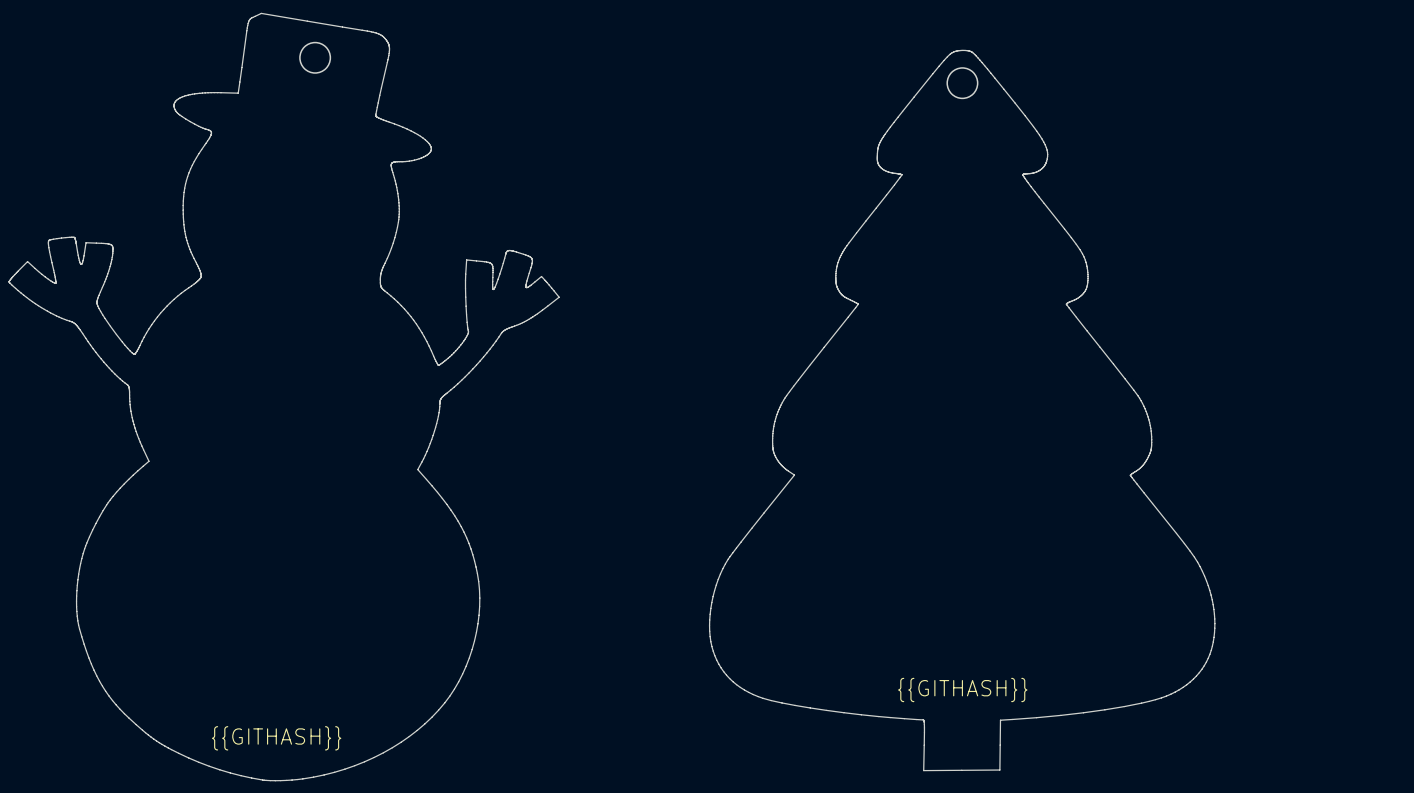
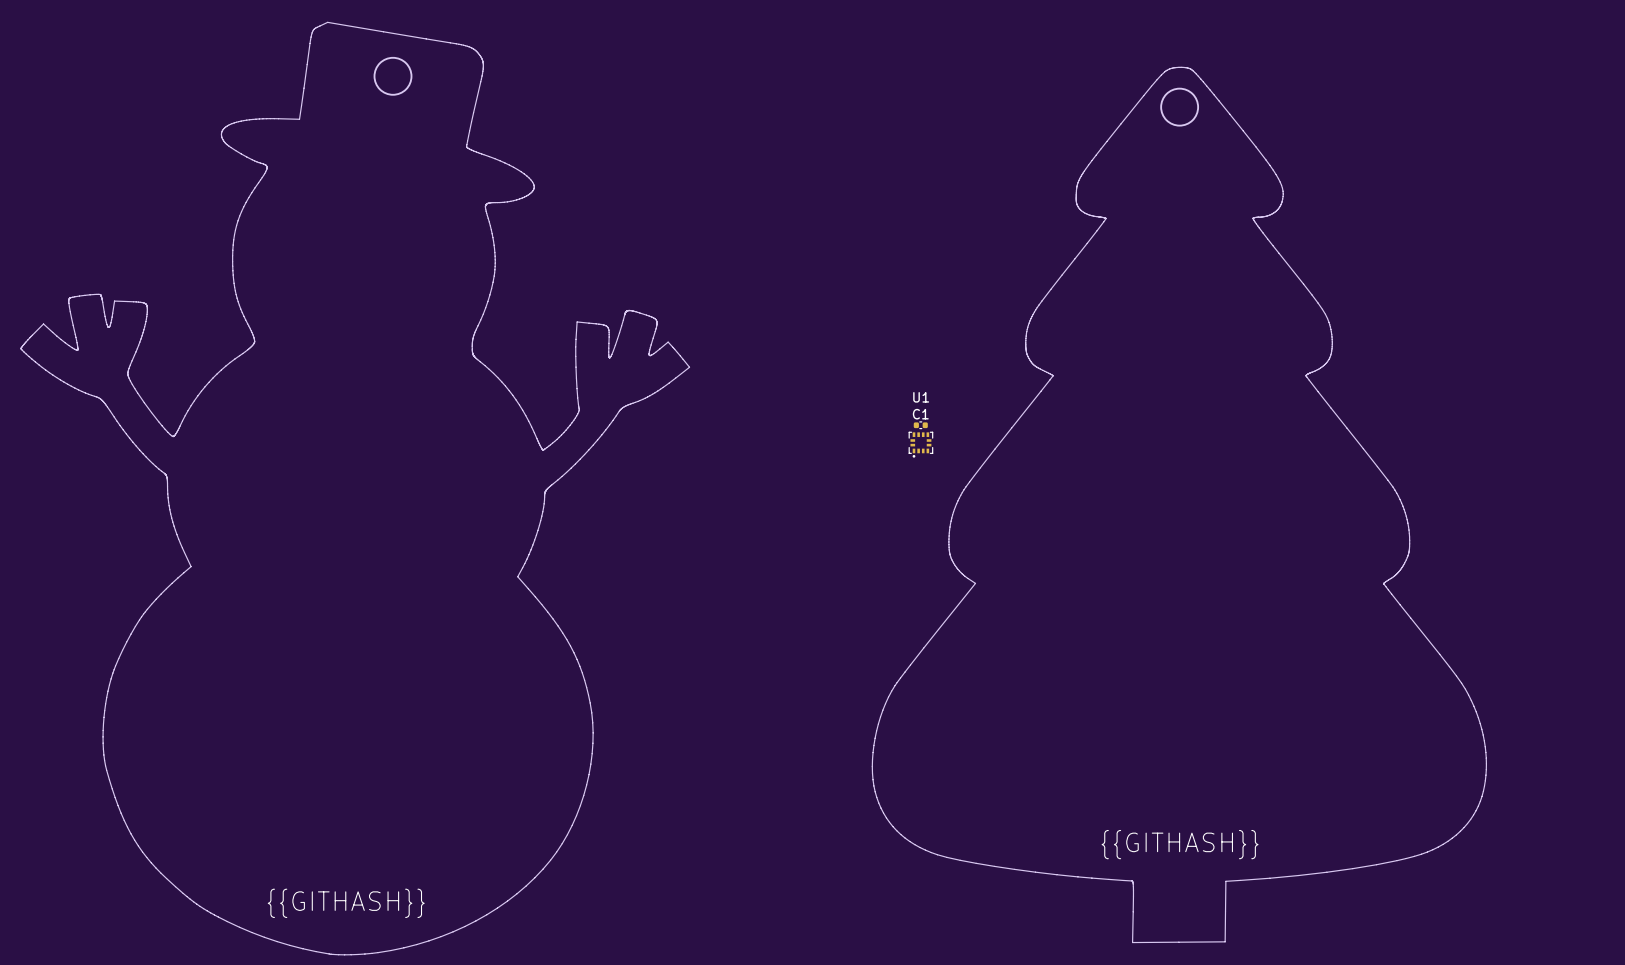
C1: none -> (920, 425)
U1: none -> (920, 444)

